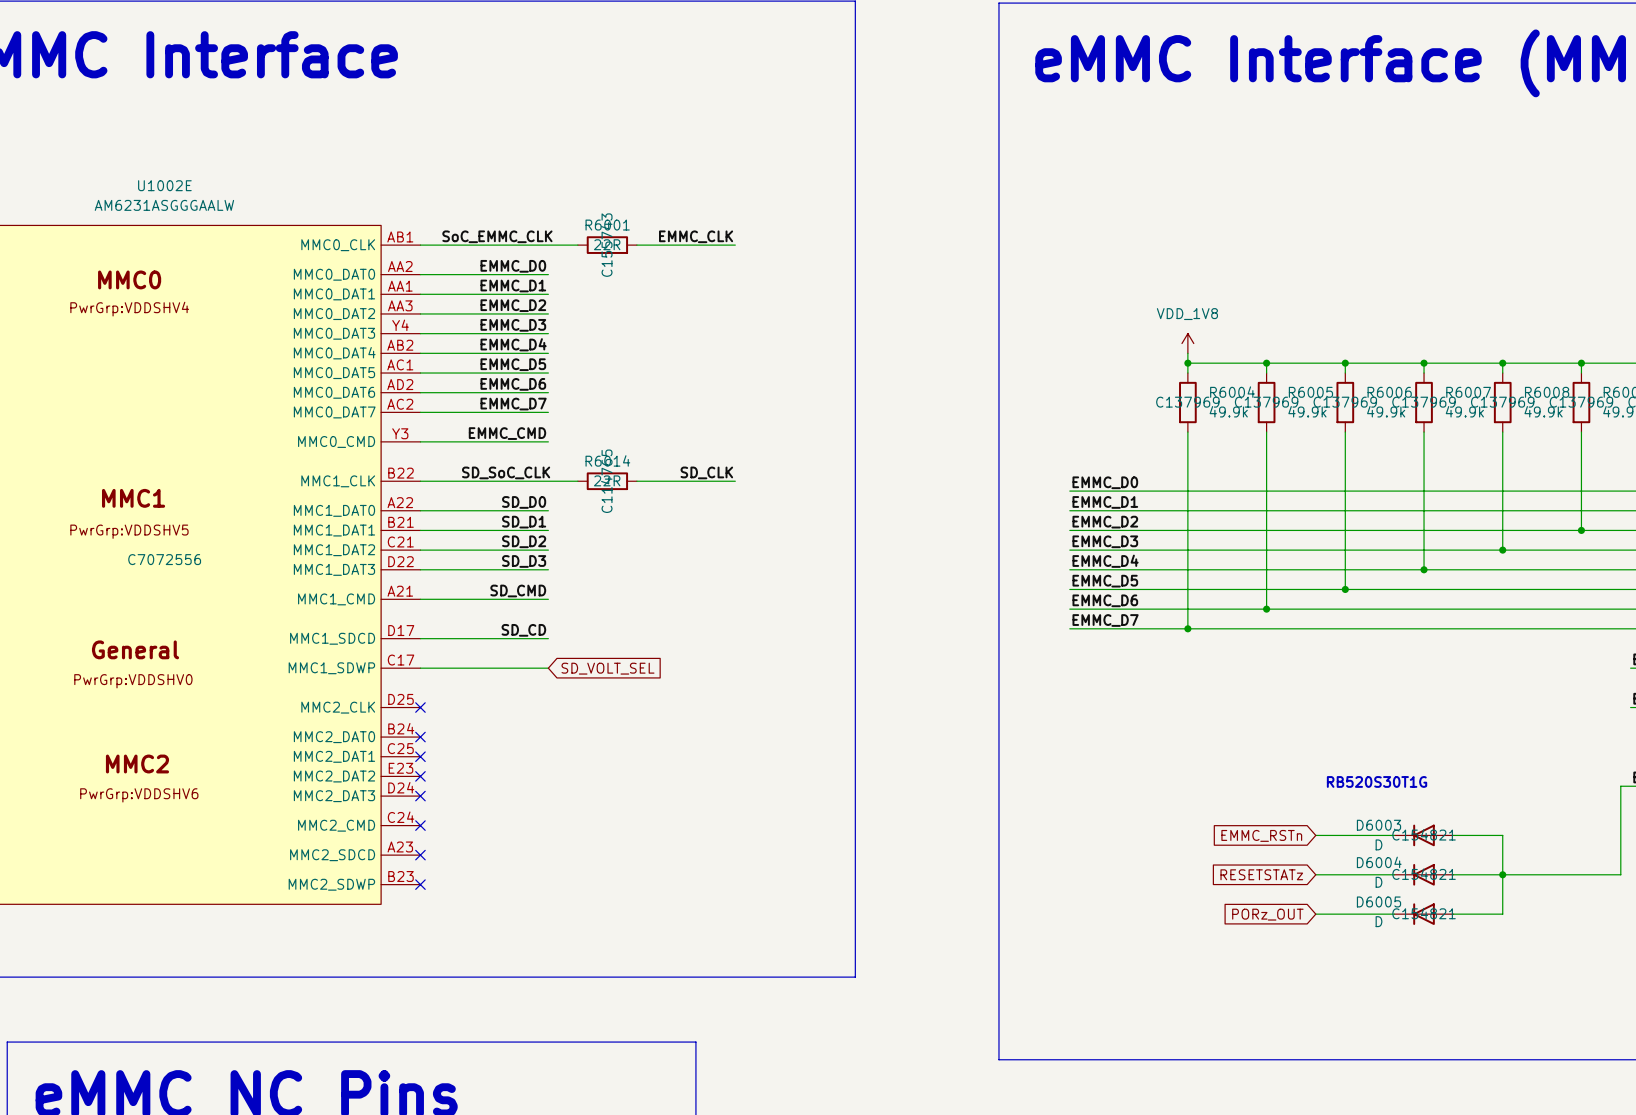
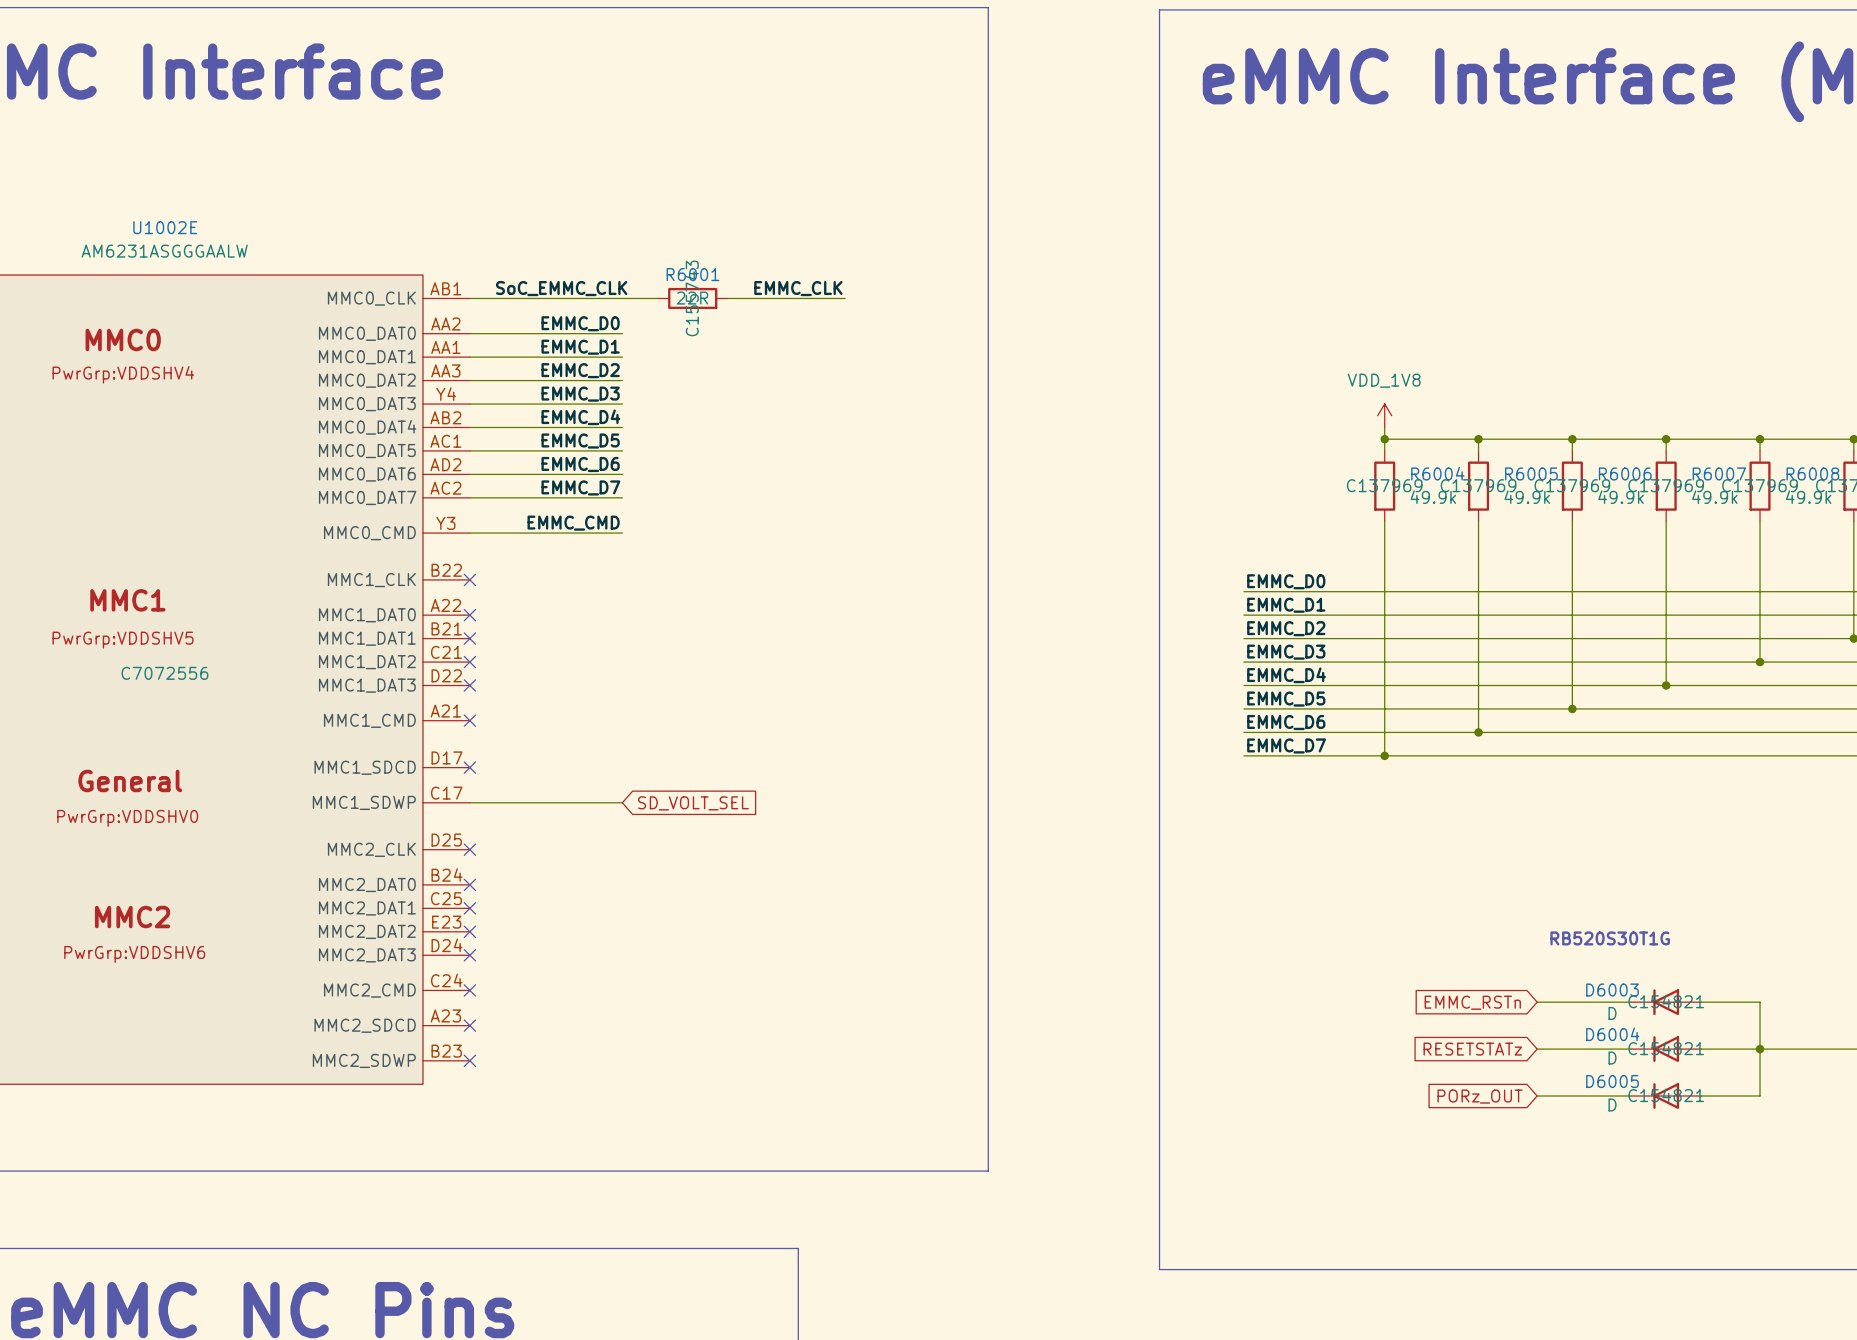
label: SD_SoC_CLK (506, 472) -> none
label: SD_CLK (706, 472) -> none
wire: (420, 481) (577, 481) -> none
no-connect mark: none -> (469, 579)
R6014: 22R (607, 481) -> none
wire: (636, 481) (735, 481) -> none
label: SD_D0 (524, 502) -> none
wire: (420, 510) (548, 510) -> none
no-connect mark: none -> (469, 615)
label: SD_D1 (524, 522) -> none
wire: (420, 530) (548, 530) -> none
no-connect mark: none -> (469, 638)
label: SD_D2 (524, 541) -> none
wire: (420, 550) (548, 550) -> none
no-connect mark: none -> (469, 662)
label: SD_D3 (524, 561) -> none
wire: (420, 569) (548, 569) -> none
no-connect mark: none -> (469, 685)
label: SD_CMD (518, 590) -> none
wire: (420, 599) (548, 599) -> none
no-connect mark: none -> (469, 720)
label: SD_CD (523, 630) -> none
wire: (420, 638) (548, 638) -> none
no-connect mark: none -> (469, 767)

